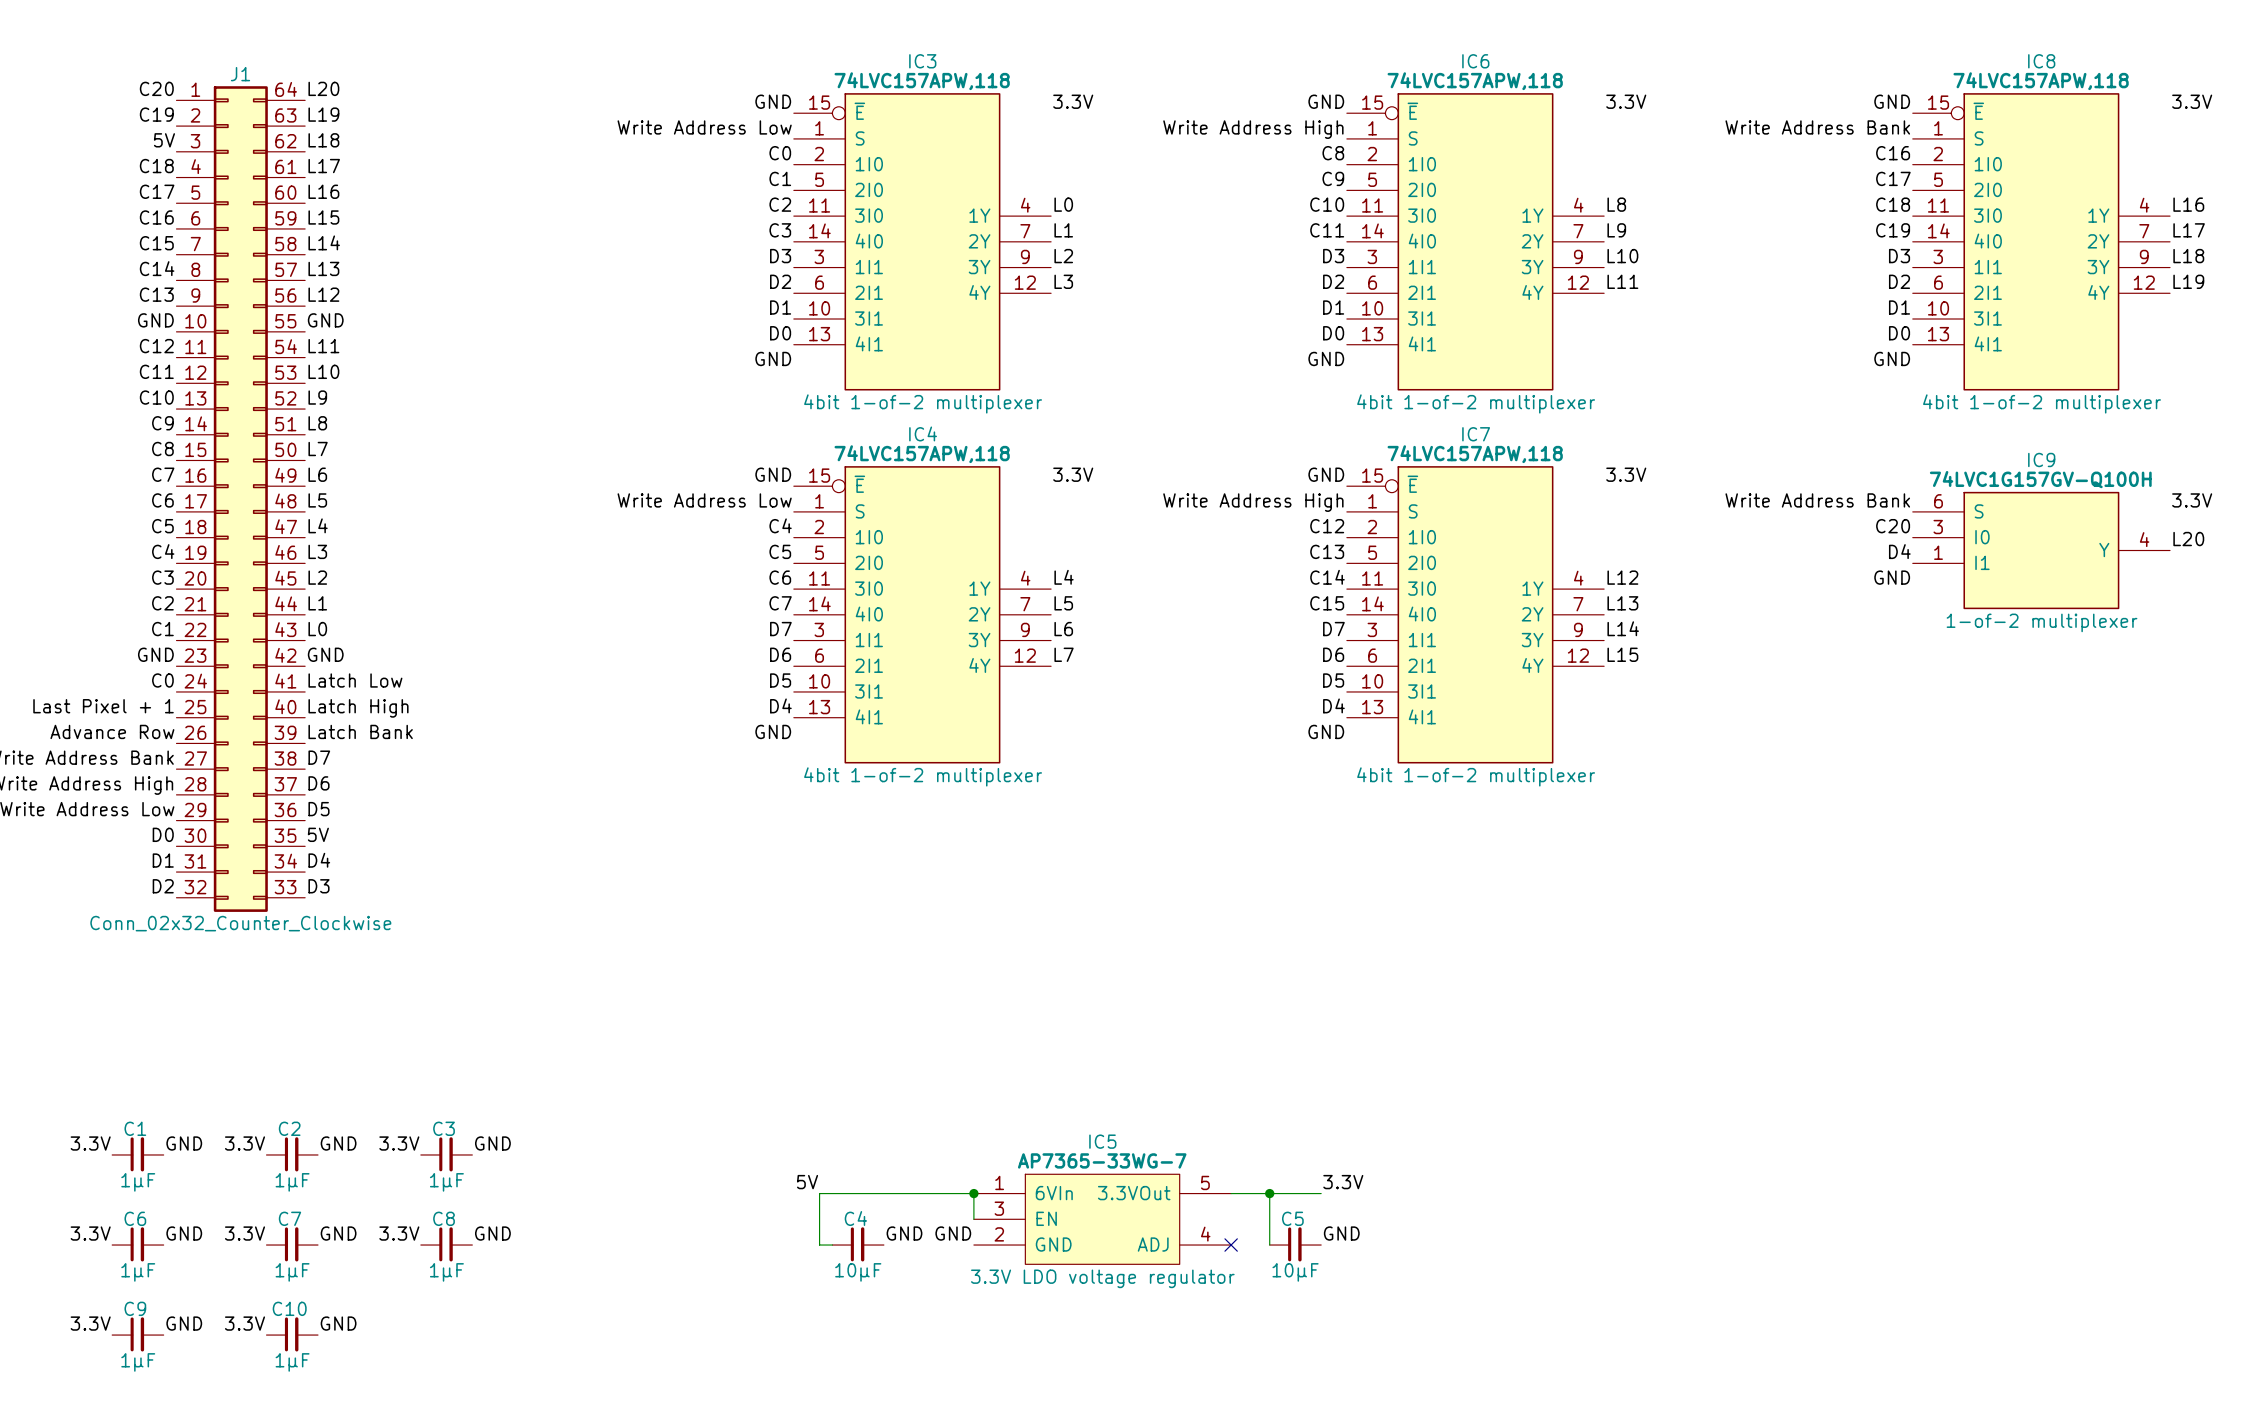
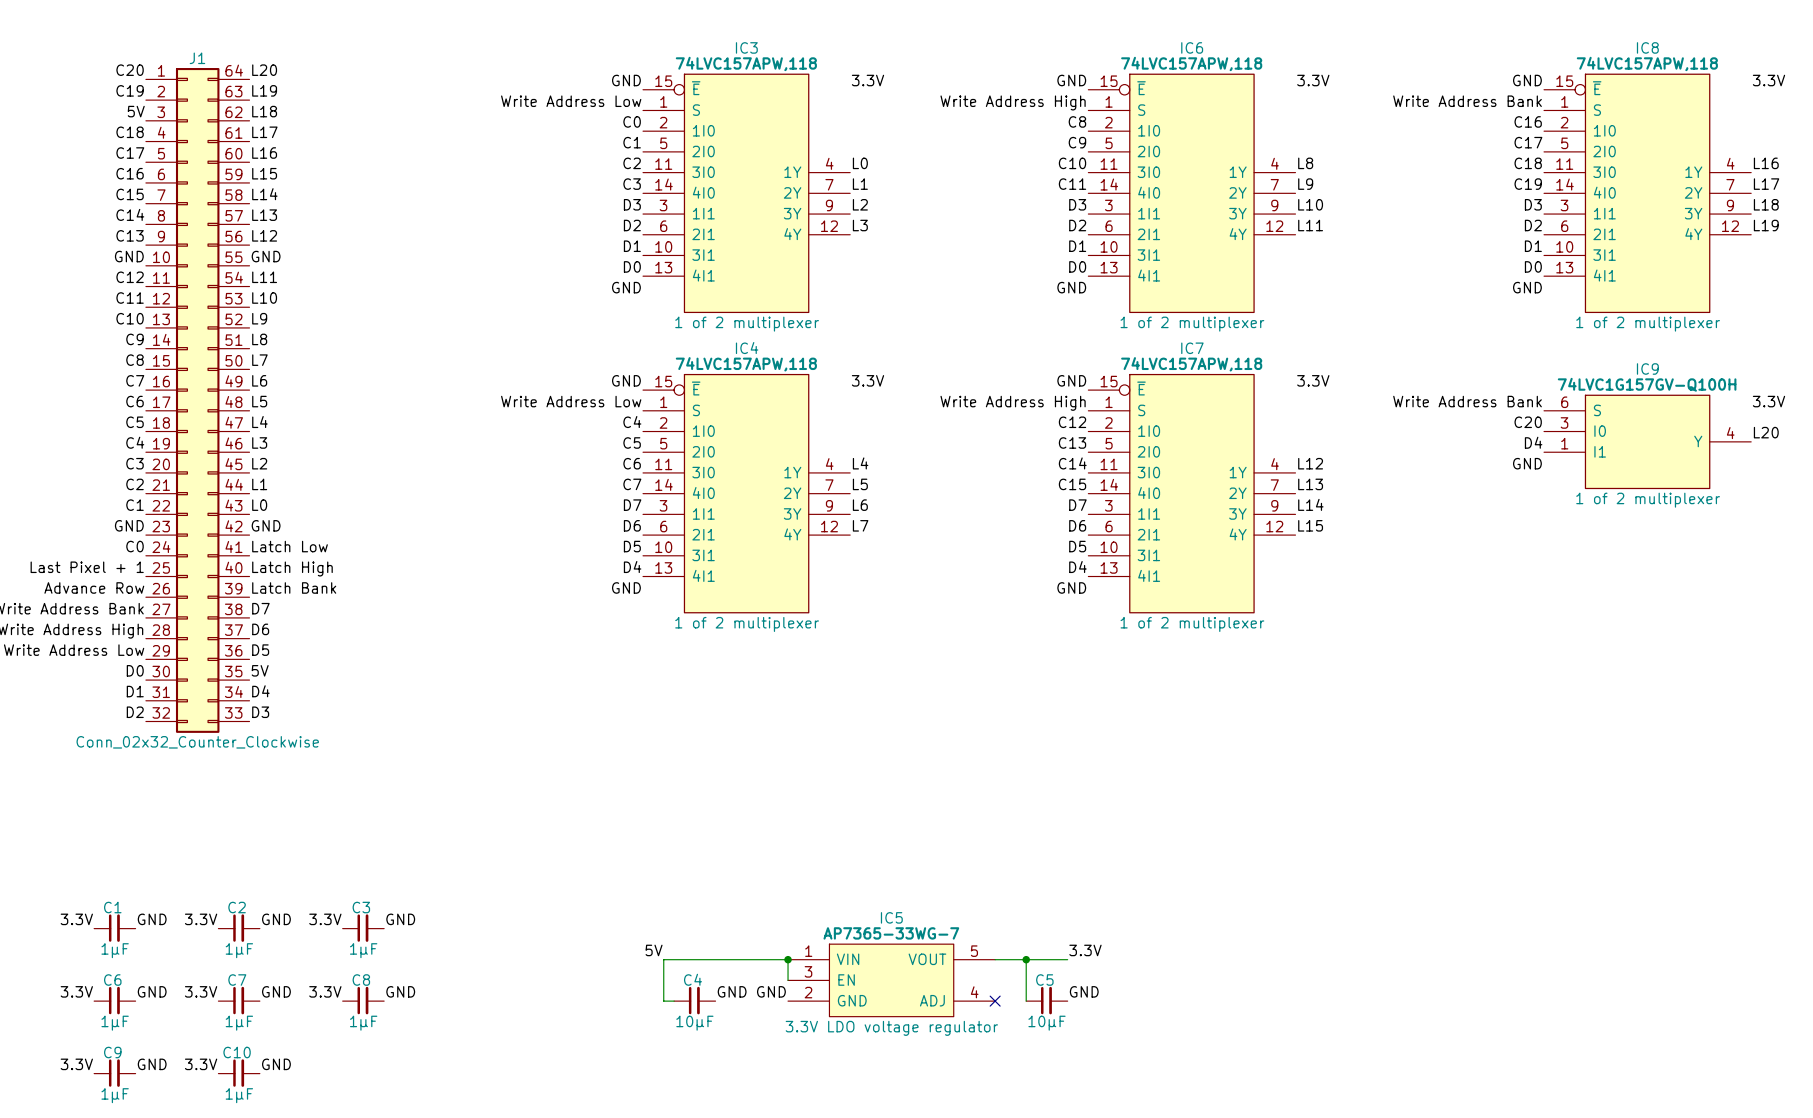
IC3 text: 4bit 1-of-2 multiplexer (923, 403) -> 1 of 2 multiplexer (747, 324)
IC6 text: 4bit 1-of-2 multiplexer (1476, 403) -> 1 of 2 multiplexer (1192, 324)
IC8 text: 4bit 1-of-2 multiplexer (2042, 403) -> 1 of 2 multiplexer (1648, 324)
IC9 text: 1-of-2 multiplexer (2042, 622) -> 1 of 2 multiplexer (1648, 500)
IC4 text: 4bit 1-of-2 multiplexer (923, 776) -> 1 of 2 multiplexer (747, 624)
IC7 text: 4bit 1-of-2 multiplexer (1476, 776) -> 1 of 2 multiplexer (1192, 624)
IC5 pin name: 6VIn (1054, 1193) -> VIN (848, 959)
IC5 pin name: 3.3VOut (1134, 1193) -> VOUT (927, 959)

